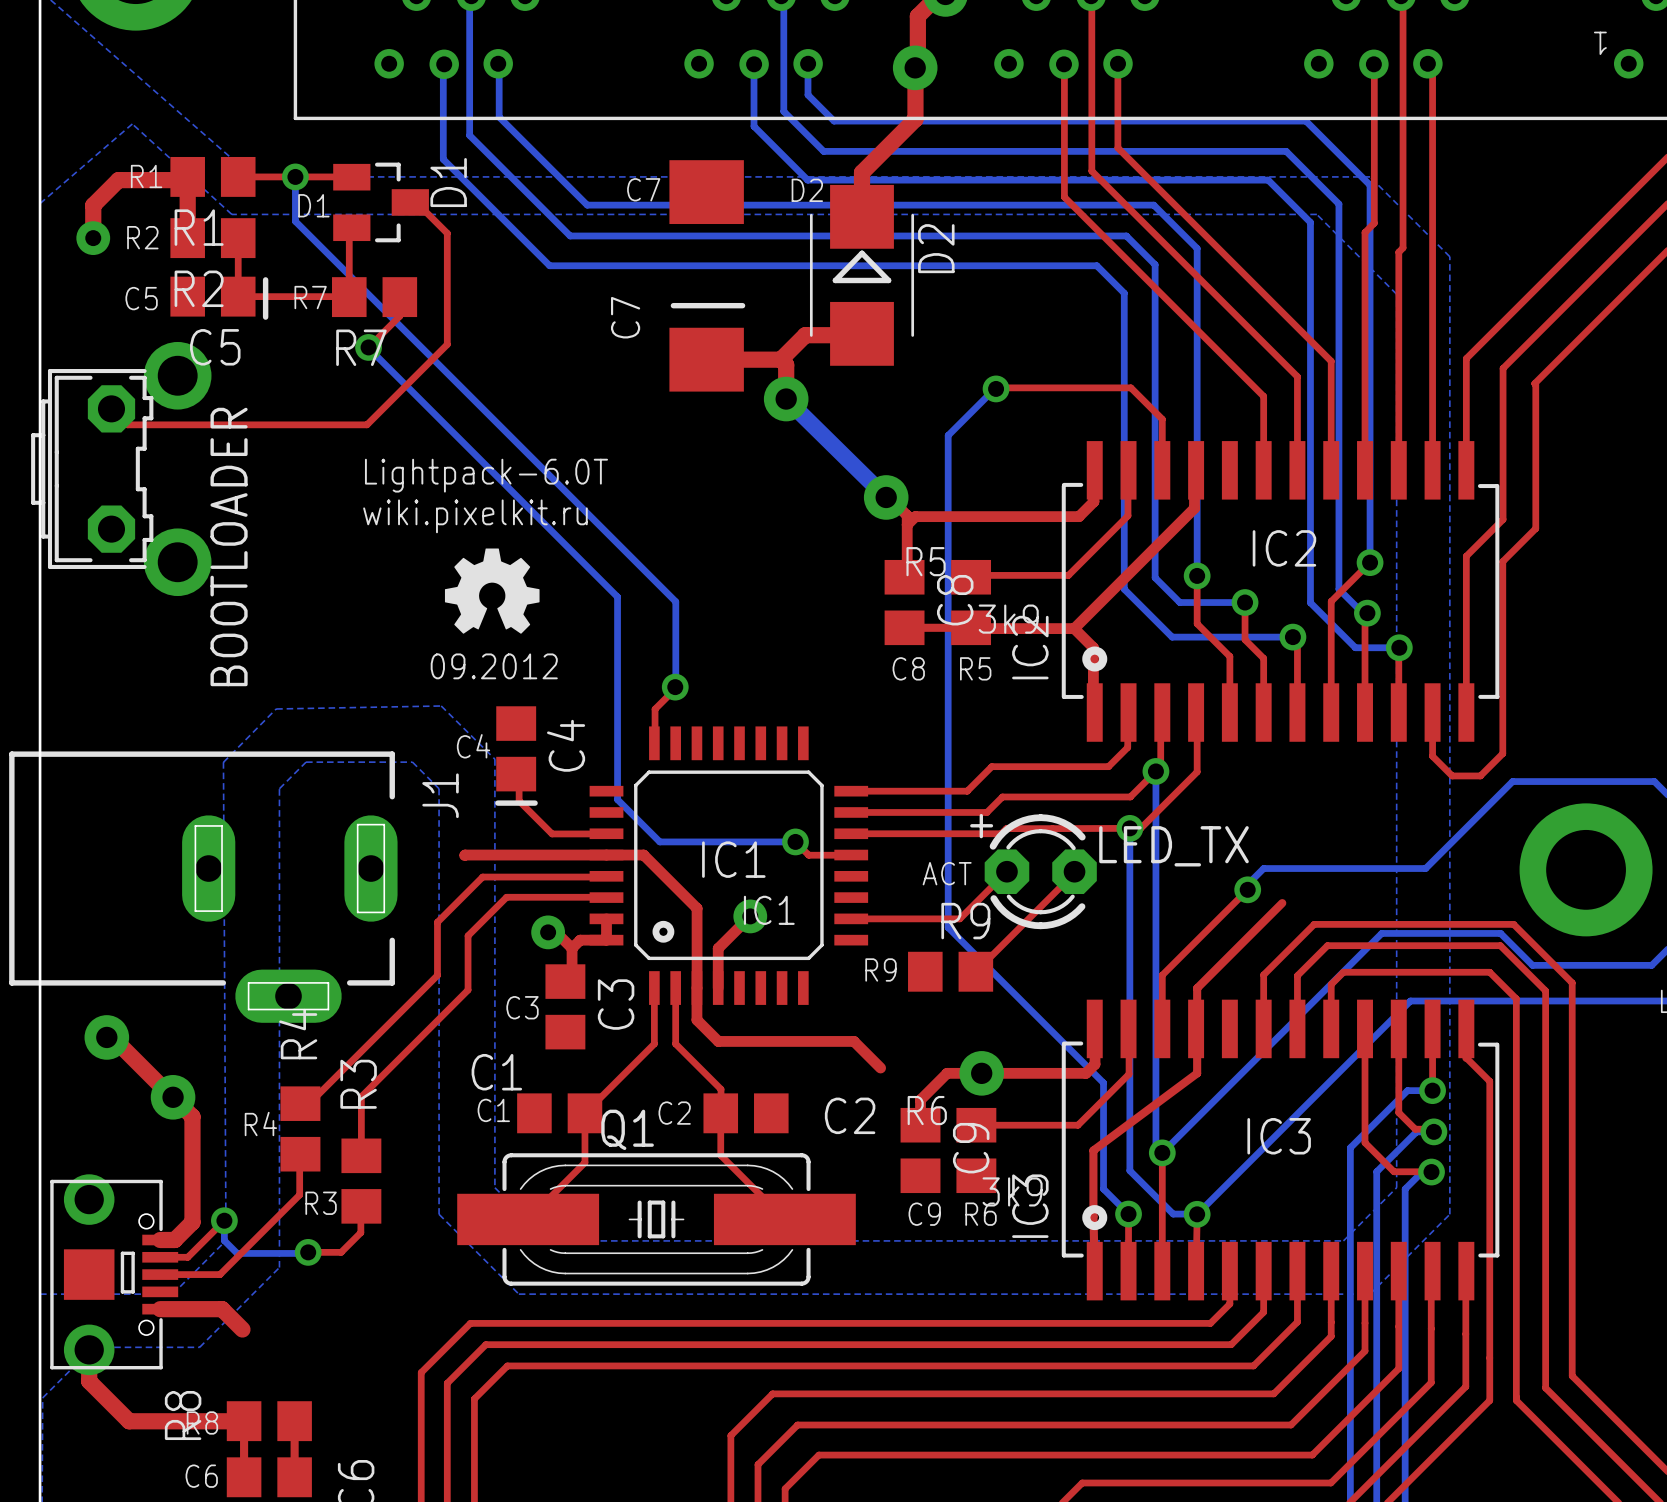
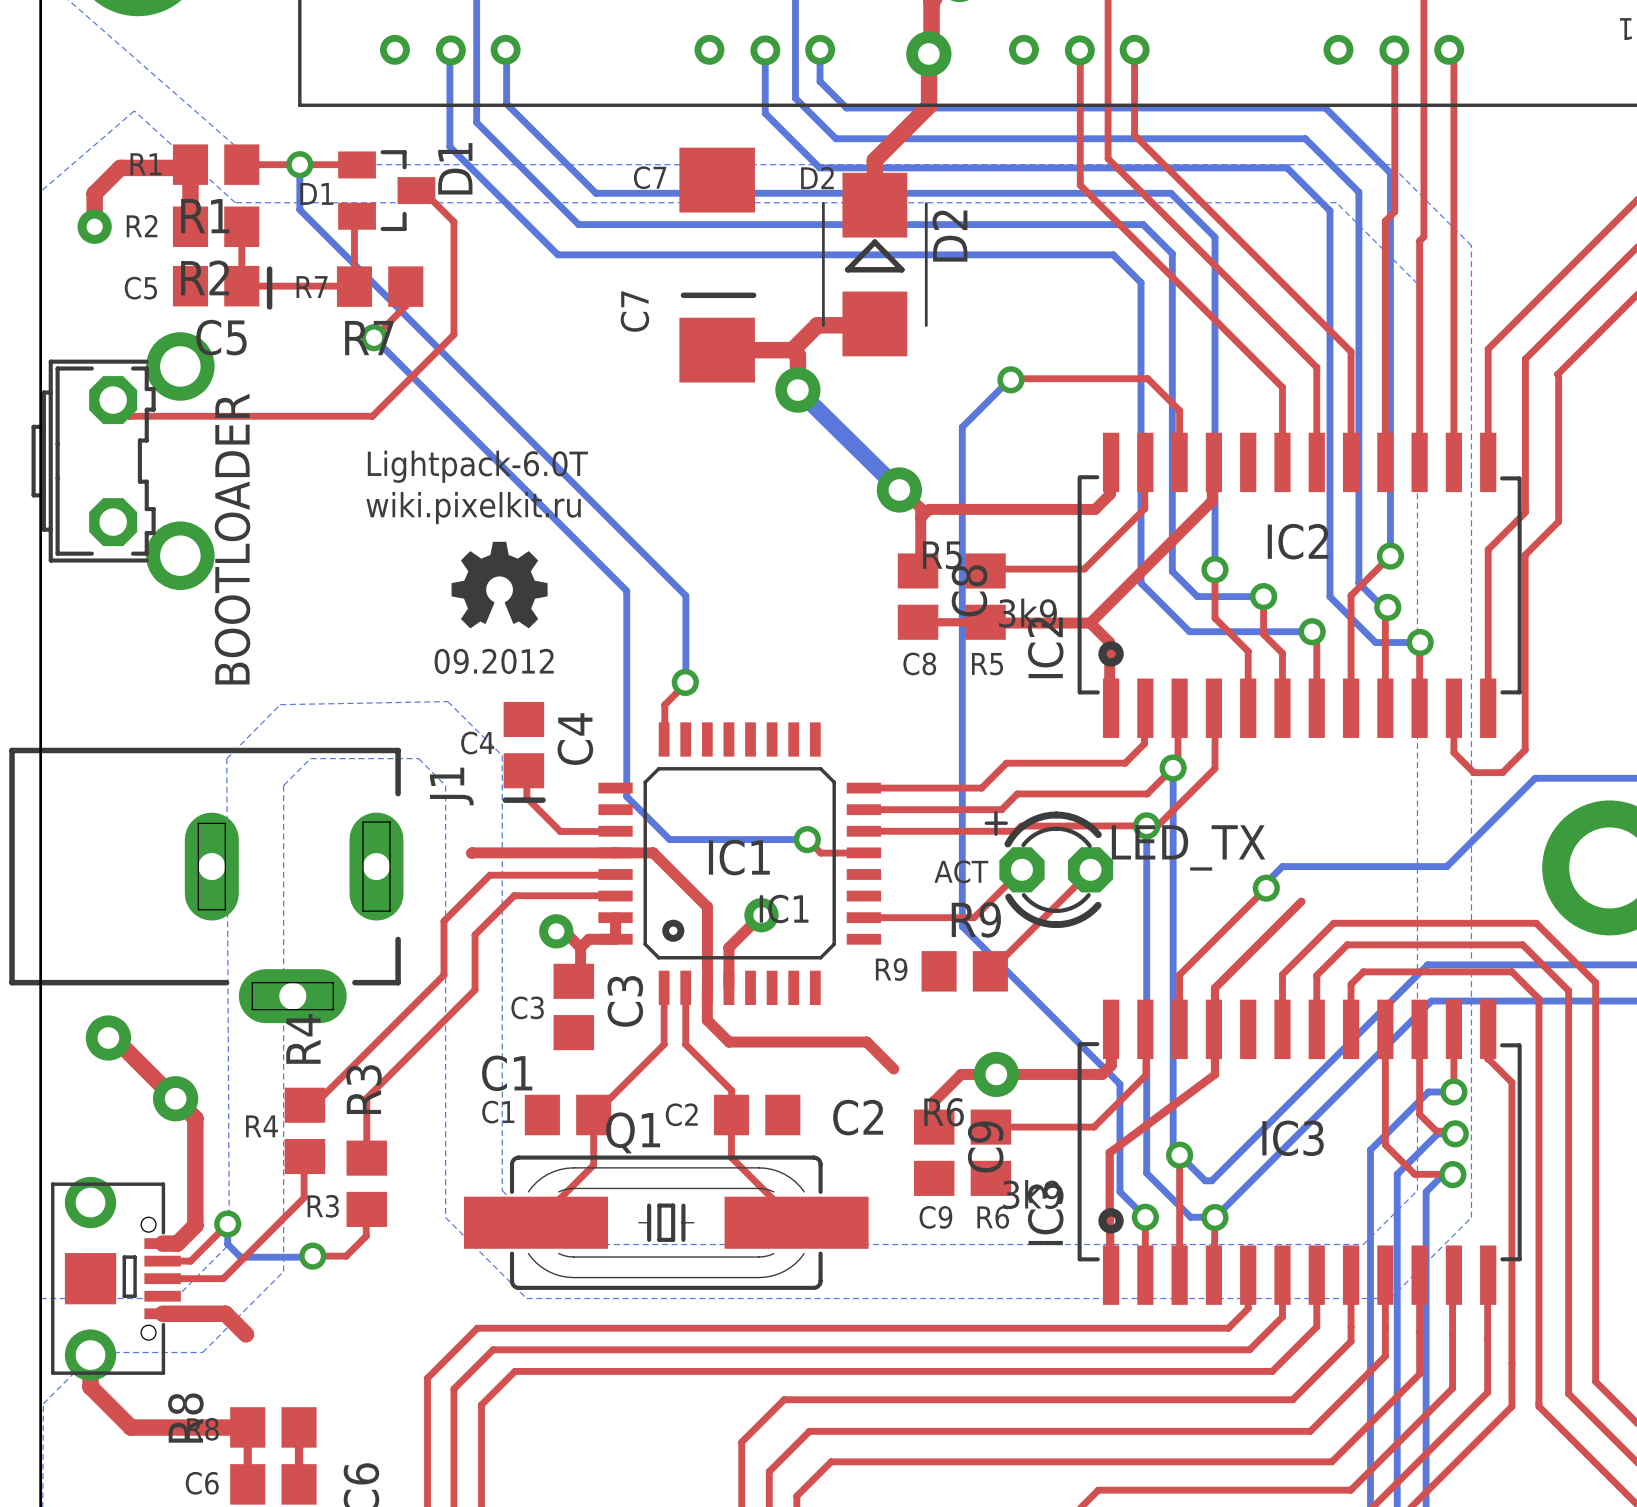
bottom track: (1532, 965) (1500, 933) (1381, 933) (1162, 1152) -> (1555, 964) (1427, 964) (1211, 1180) (1205, 1180) (1179, 1155)

